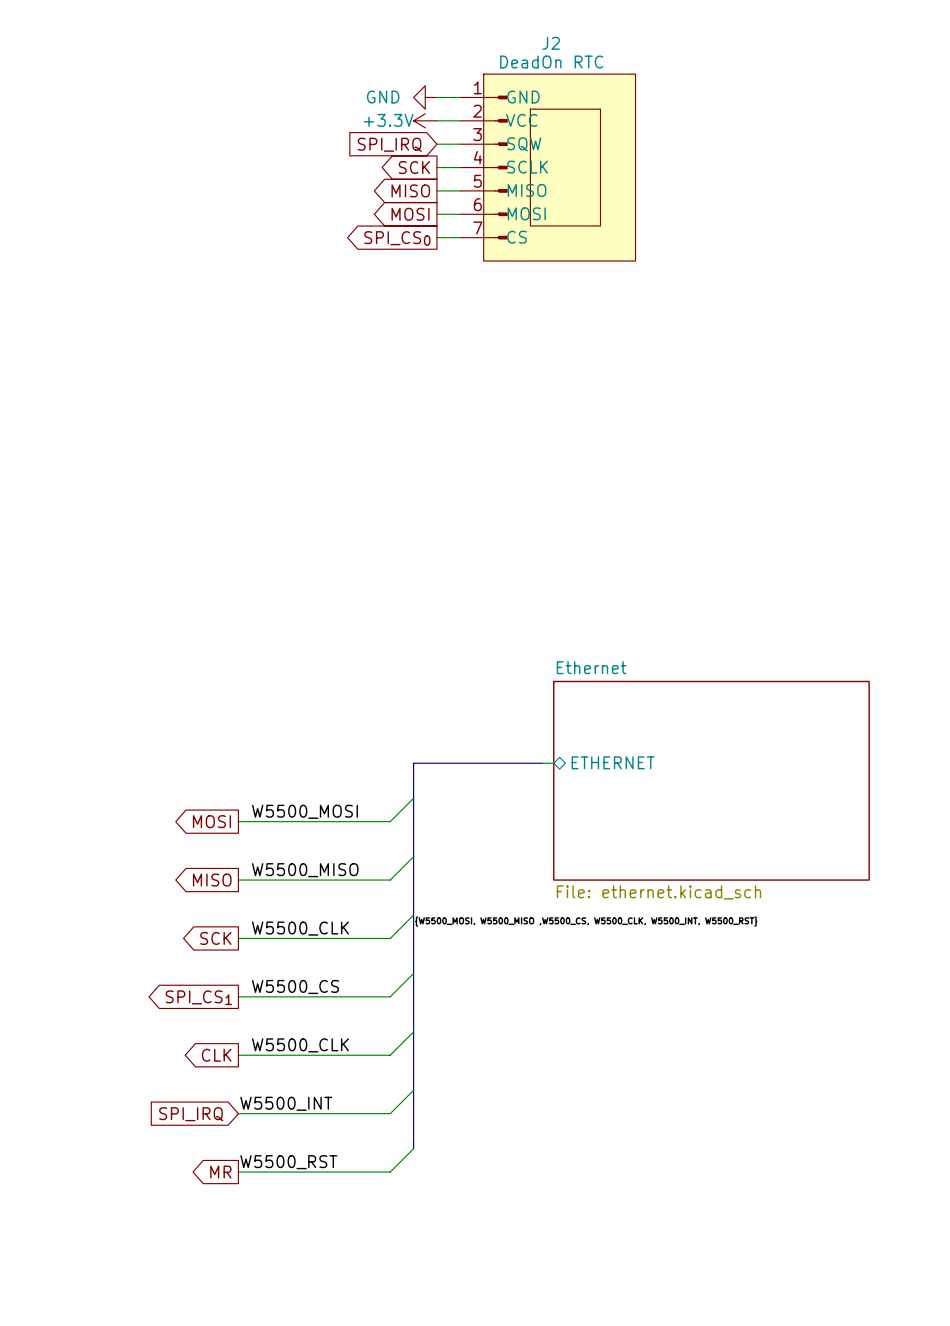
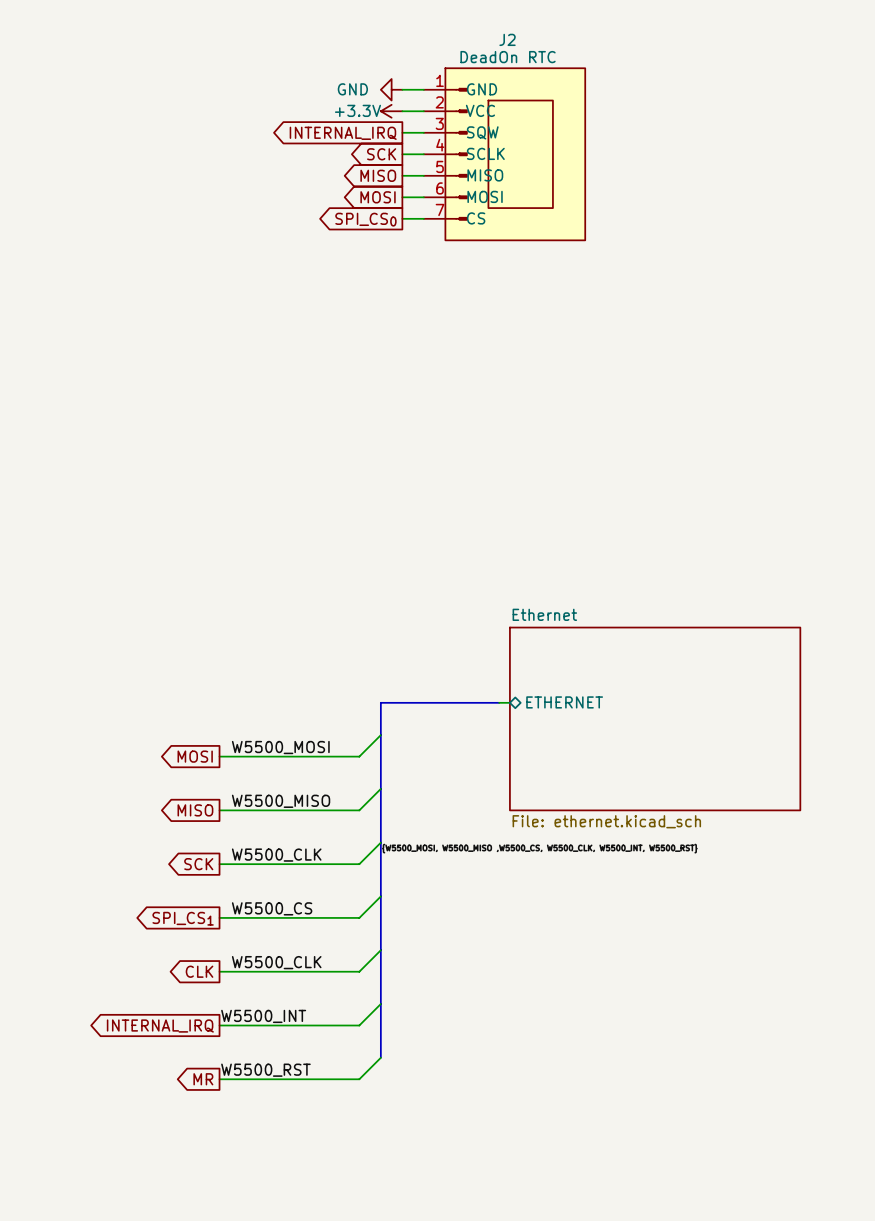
global label shape: input (389, 144) -> output (343, 133)
global label: SPI_IRQ (389, 144) -> INTERNAL_IRQ (343, 133)
global label shape: input (191, 1114) -> output (160, 1026)
global label: SPI_IRQ (191, 1114) -> INTERNAL_IRQ (160, 1026)

